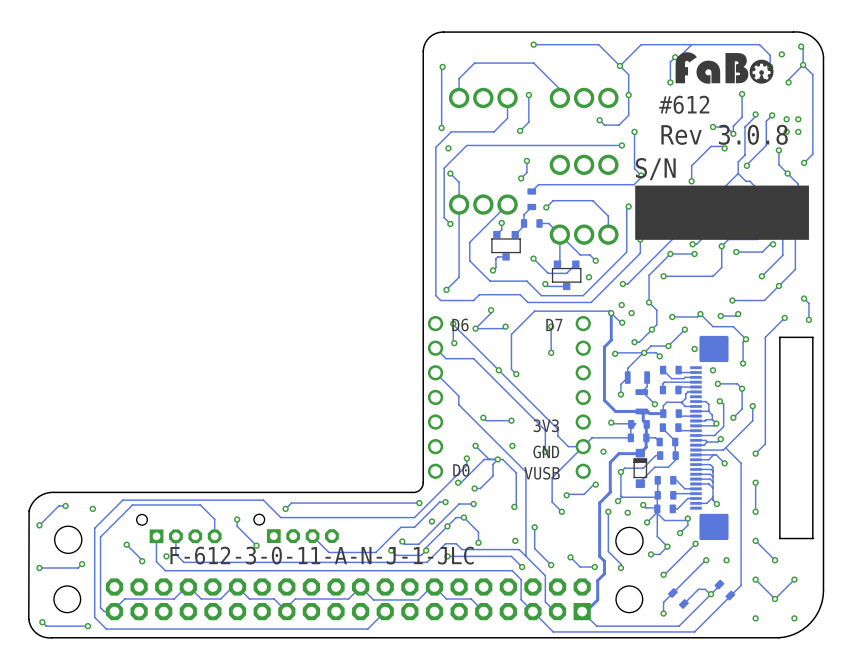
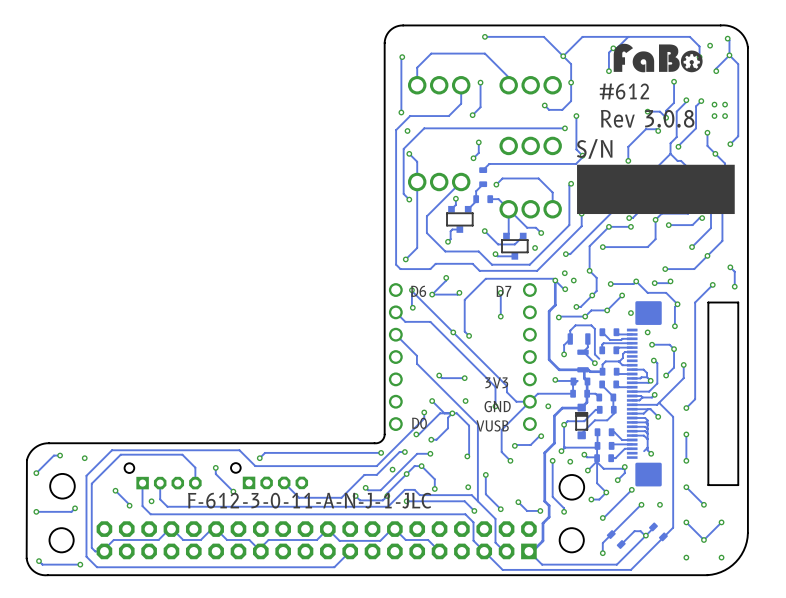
track: (643, 352) (633, 362) -> (599, 358) (594, 354) (594, 328) (591, 325) (575, 325)
track: (644, 352) (656, 352) (659, 356) -> none
via: (659, 356) -> none
track: (695, 401) (706, 401) (708, 404) (708, 411) -> none
track: (709, 501) (706, 503) (695, 503) -> none

